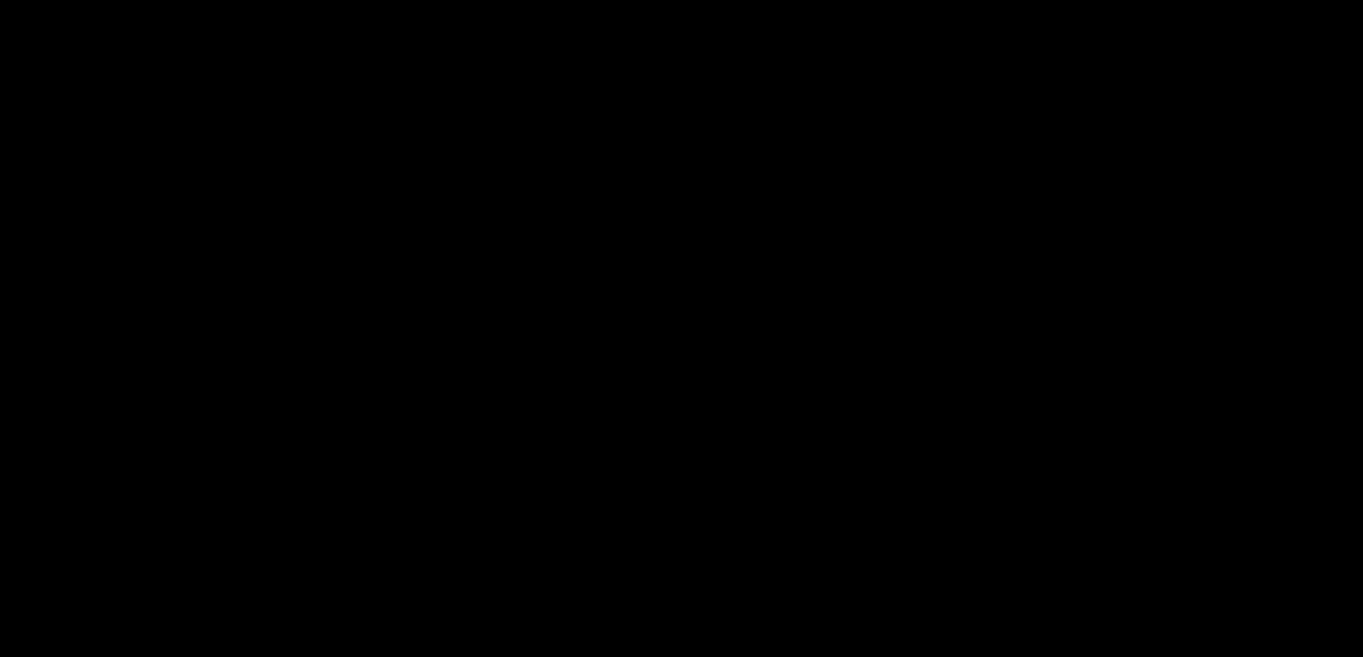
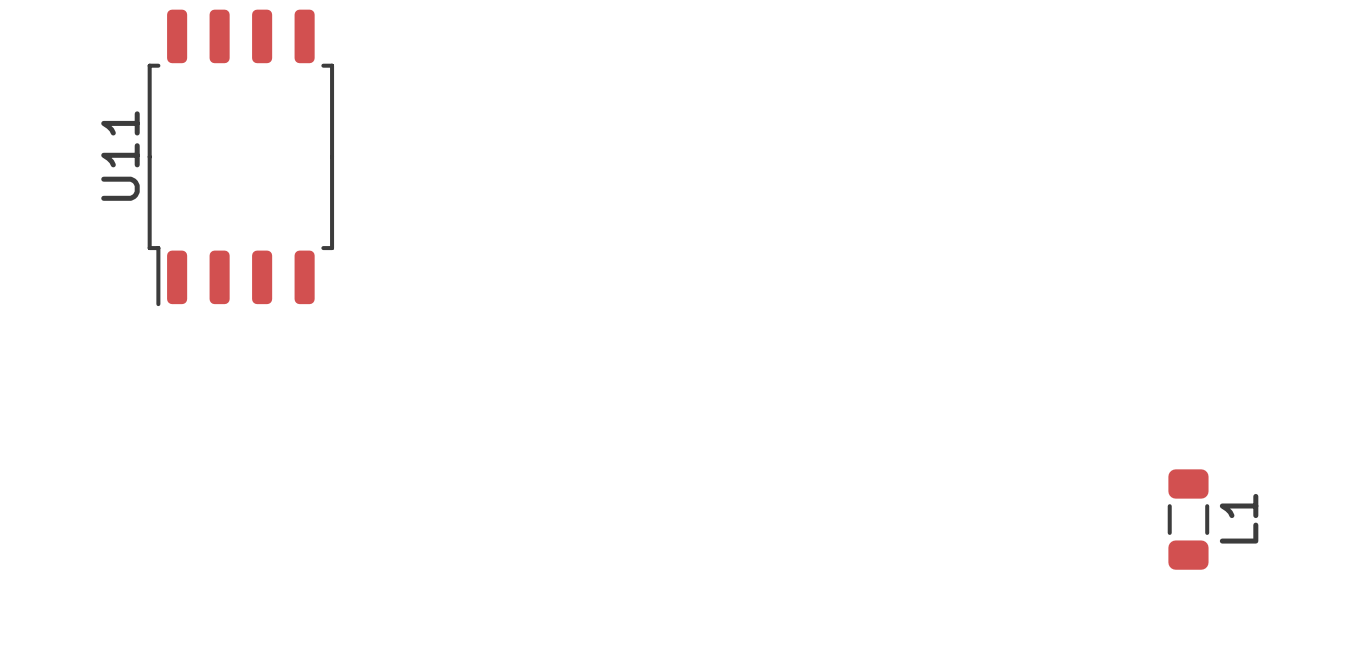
U11: none -> (240, 157)
L1: none -> (1188, 519)

